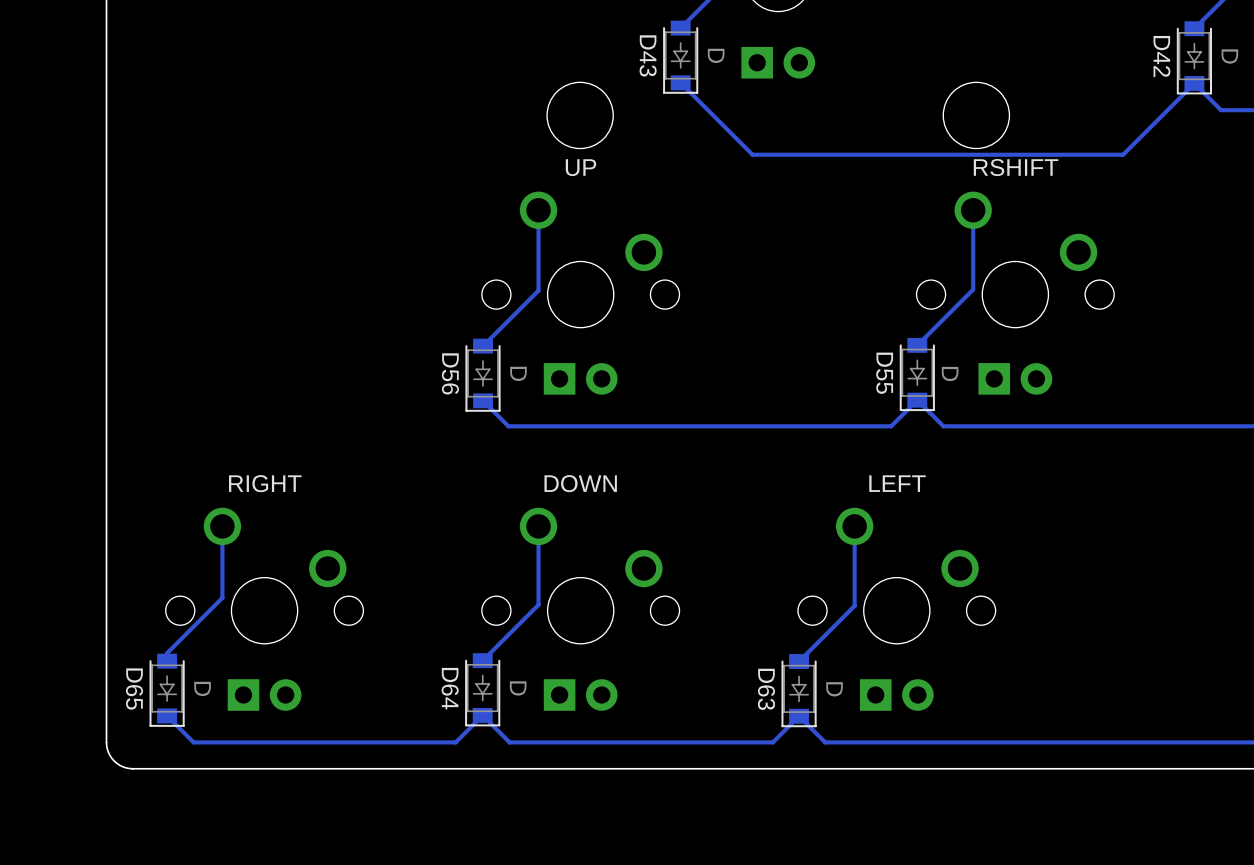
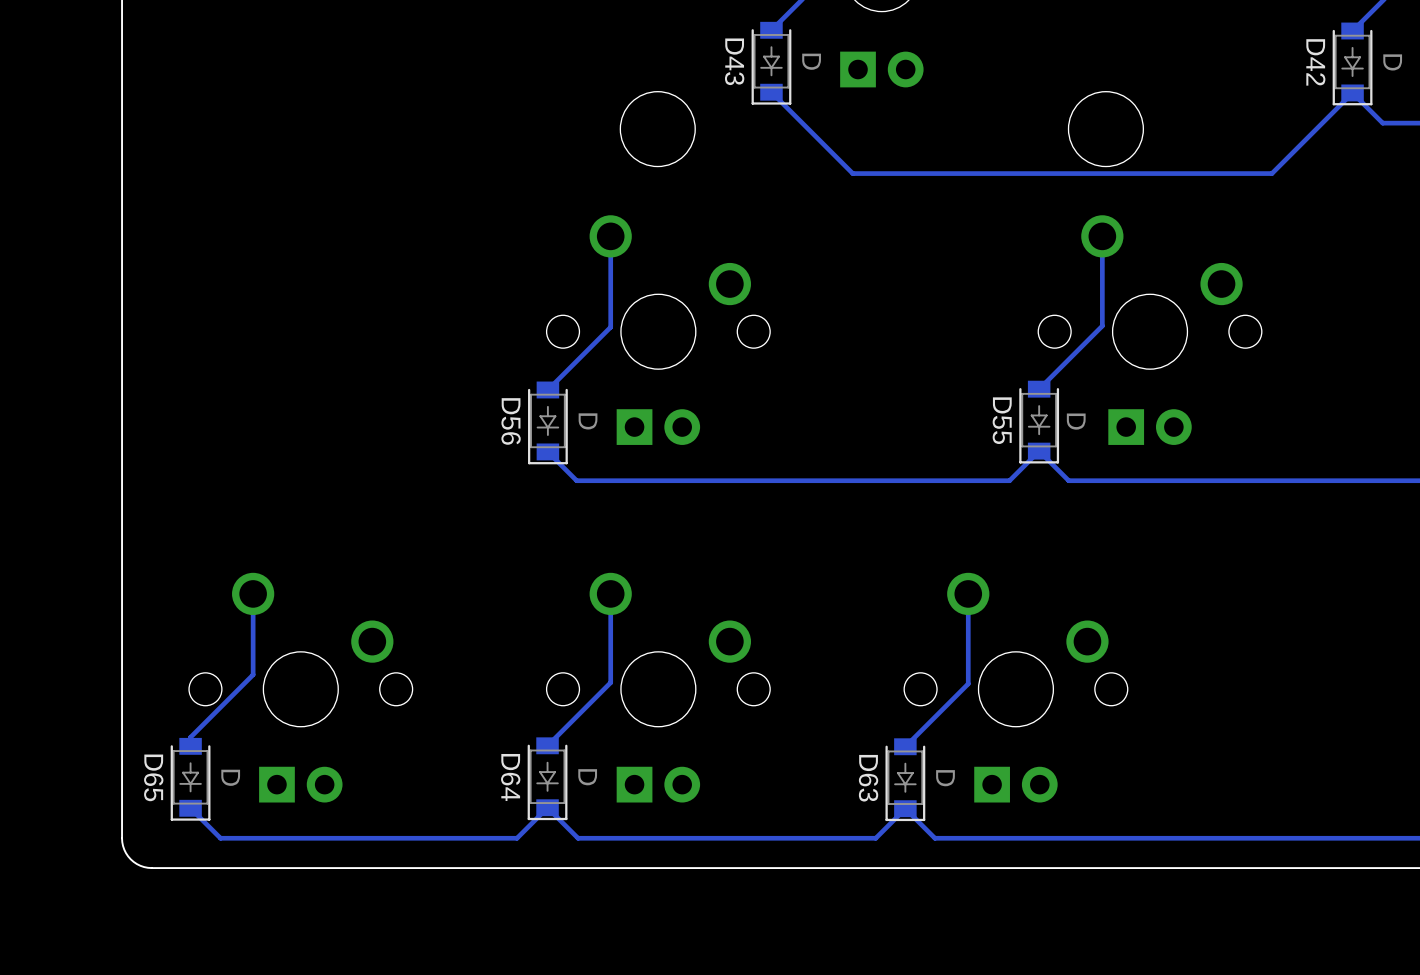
part value: UP (580, 167) -> none
part value: RSHIFT (1016, 167) -> none
part value: RIGHT (265, 483) -> none
part value: DOWN (580, 483) -> none
part value: LEFT (897, 483) -> none

